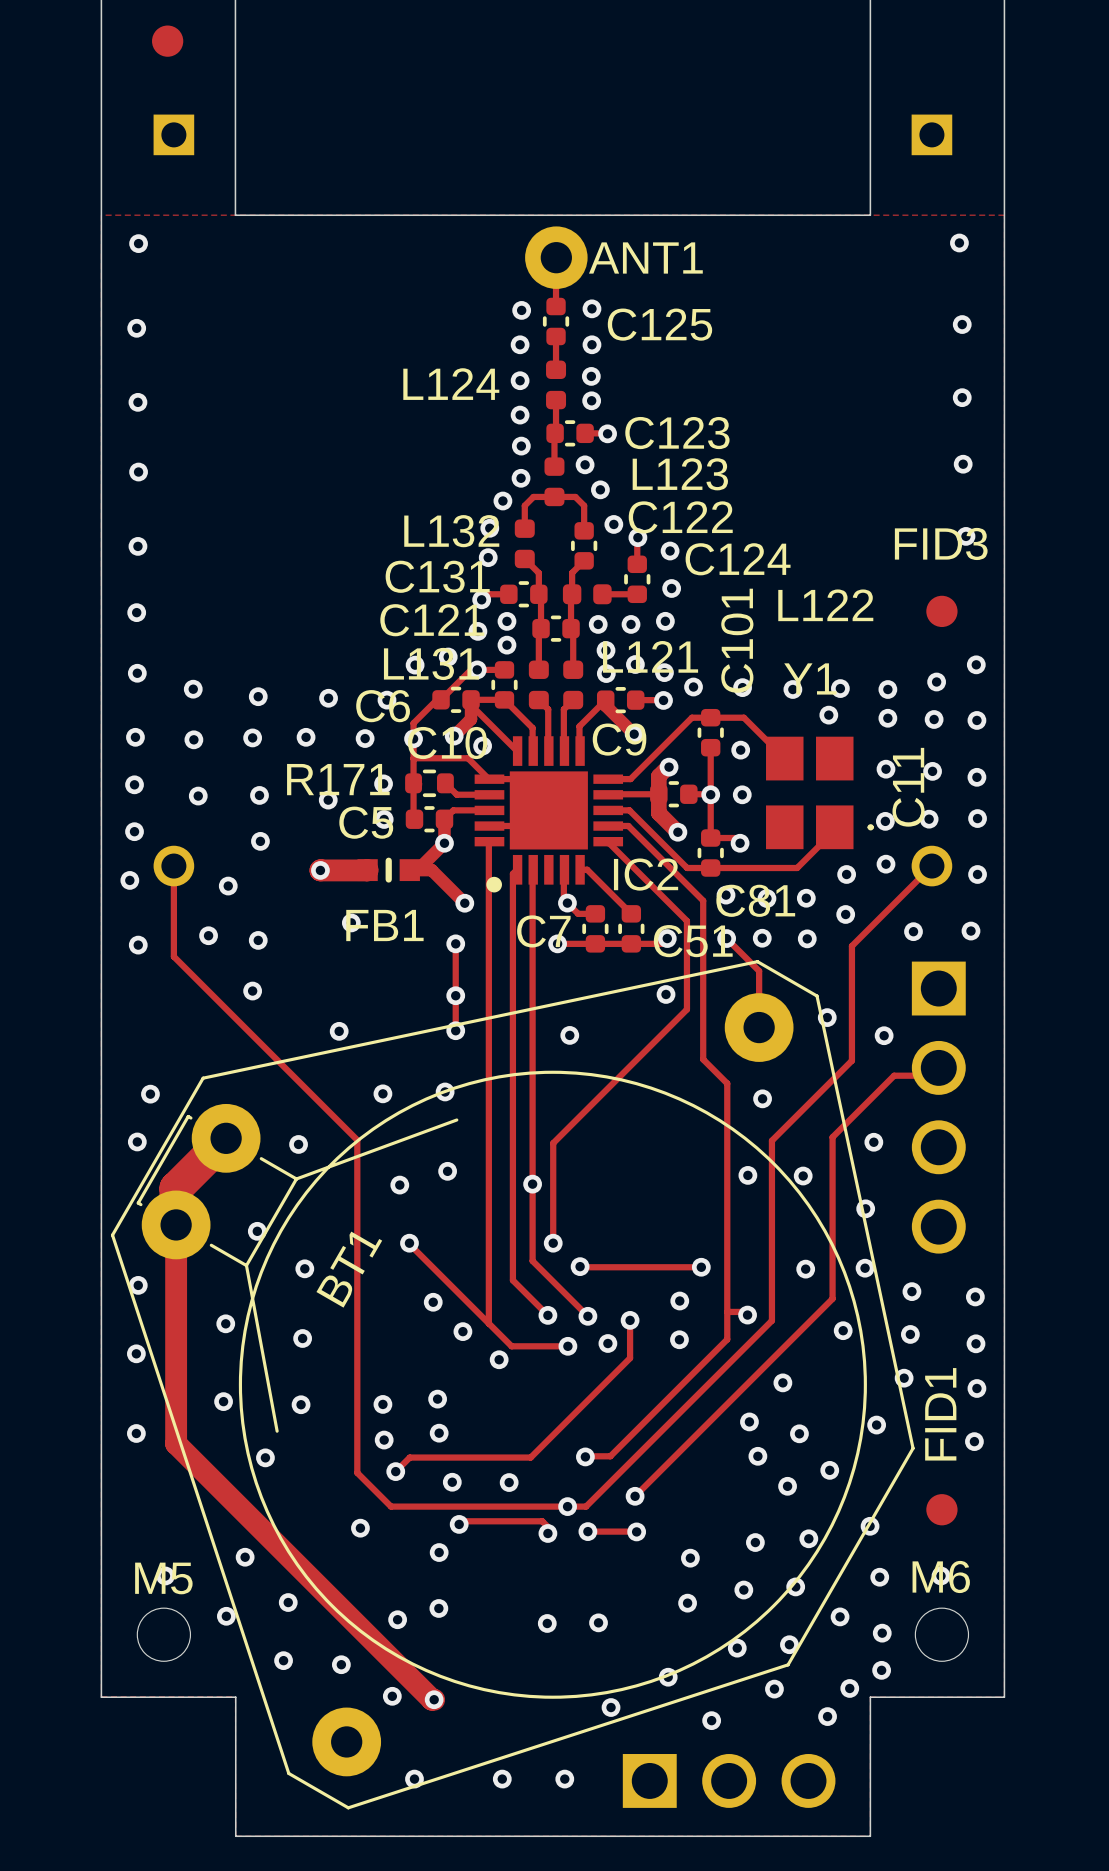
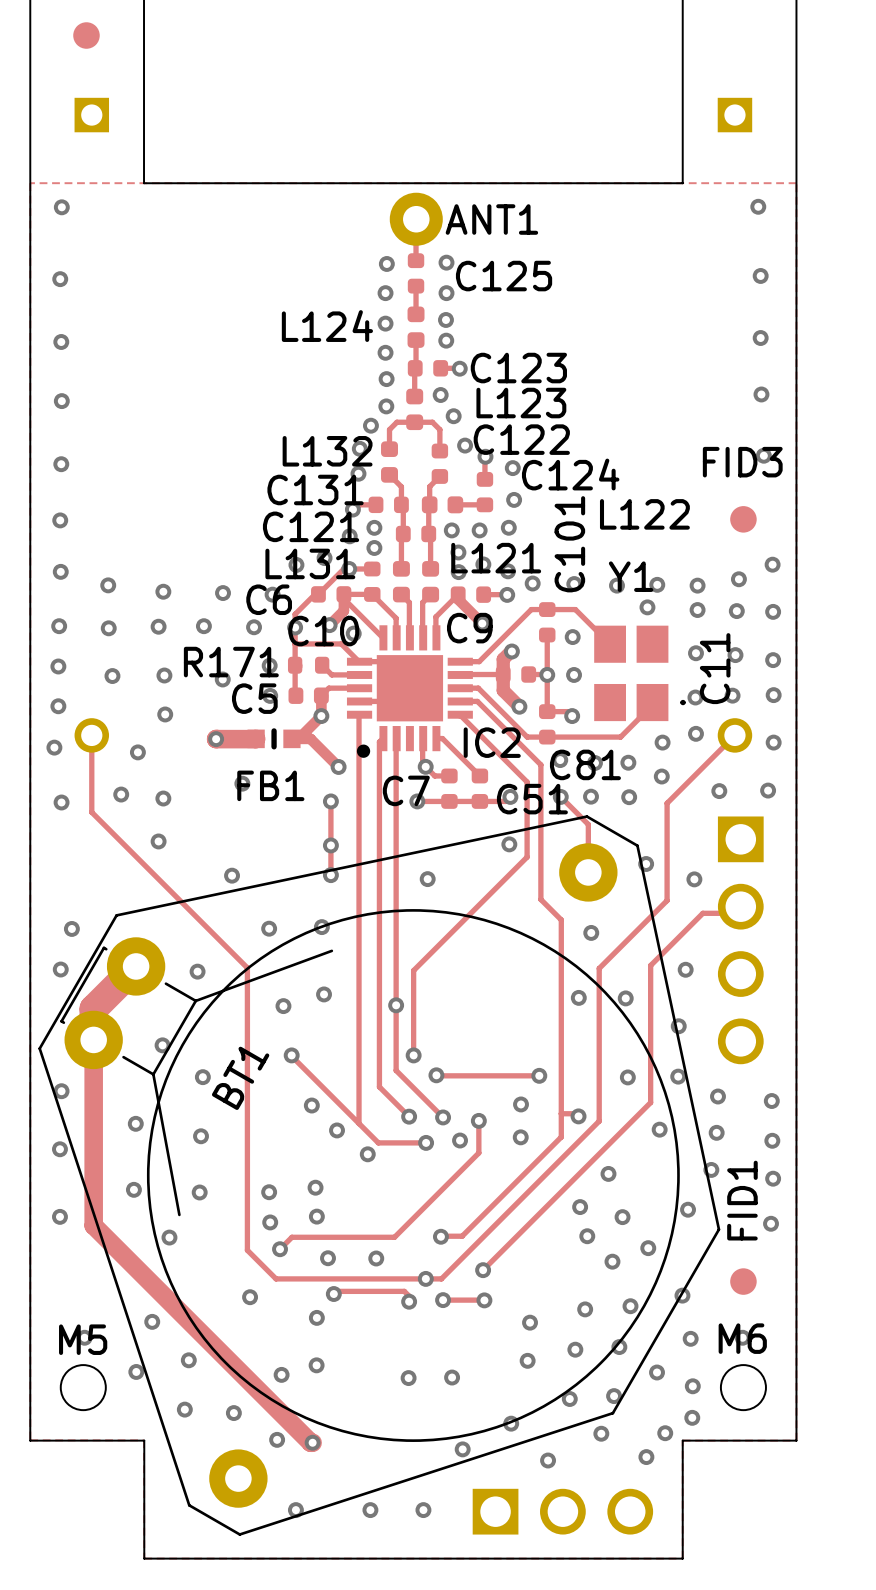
C125 footprint: [542, 297, 570, 346] -> [407, 253, 425, 294]
C123 footprint: [546, 420, 594, 447] -> [407, 360, 449, 377]
C122 footprint: [571, 522, 598, 570] -> [431, 443, 449, 484]
C124 footprint: [624, 555, 651, 604] -> [476, 471, 494, 513]
C131 footprint: [500, 581, 548, 608] -> [368, 496, 409, 514]
C121 footprint: [532, 615, 580, 642] -> [395, 525, 437, 543]
C10 footprint: [491, 661, 518, 709] -> [364, 561, 381, 602]
C6 footprint: [432, 686, 480, 713] -> [311, 586, 352, 603]
C9 footprint: [596, 687, 645, 714] -> [450, 586, 492, 603]
C101 footprint: [697, 708, 724, 757] -> [539, 602, 556, 643]
R171 footprint: [405, 769, 454, 798] -> [287, 656, 330, 674]
C11 footprint: [650, 781, 698, 808] -> [495, 666, 537, 683]
C5 footprint: [405, 806, 454, 833] -> [288, 687, 329, 704]
C81 footprint: [697, 829, 724, 877] -> [539, 704, 556, 745]
C7 footprint: [582, 905, 609, 953] -> [441, 768, 458, 809]
C51 footprint: [618, 905, 645, 953] -> [471, 768, 489, 809]

